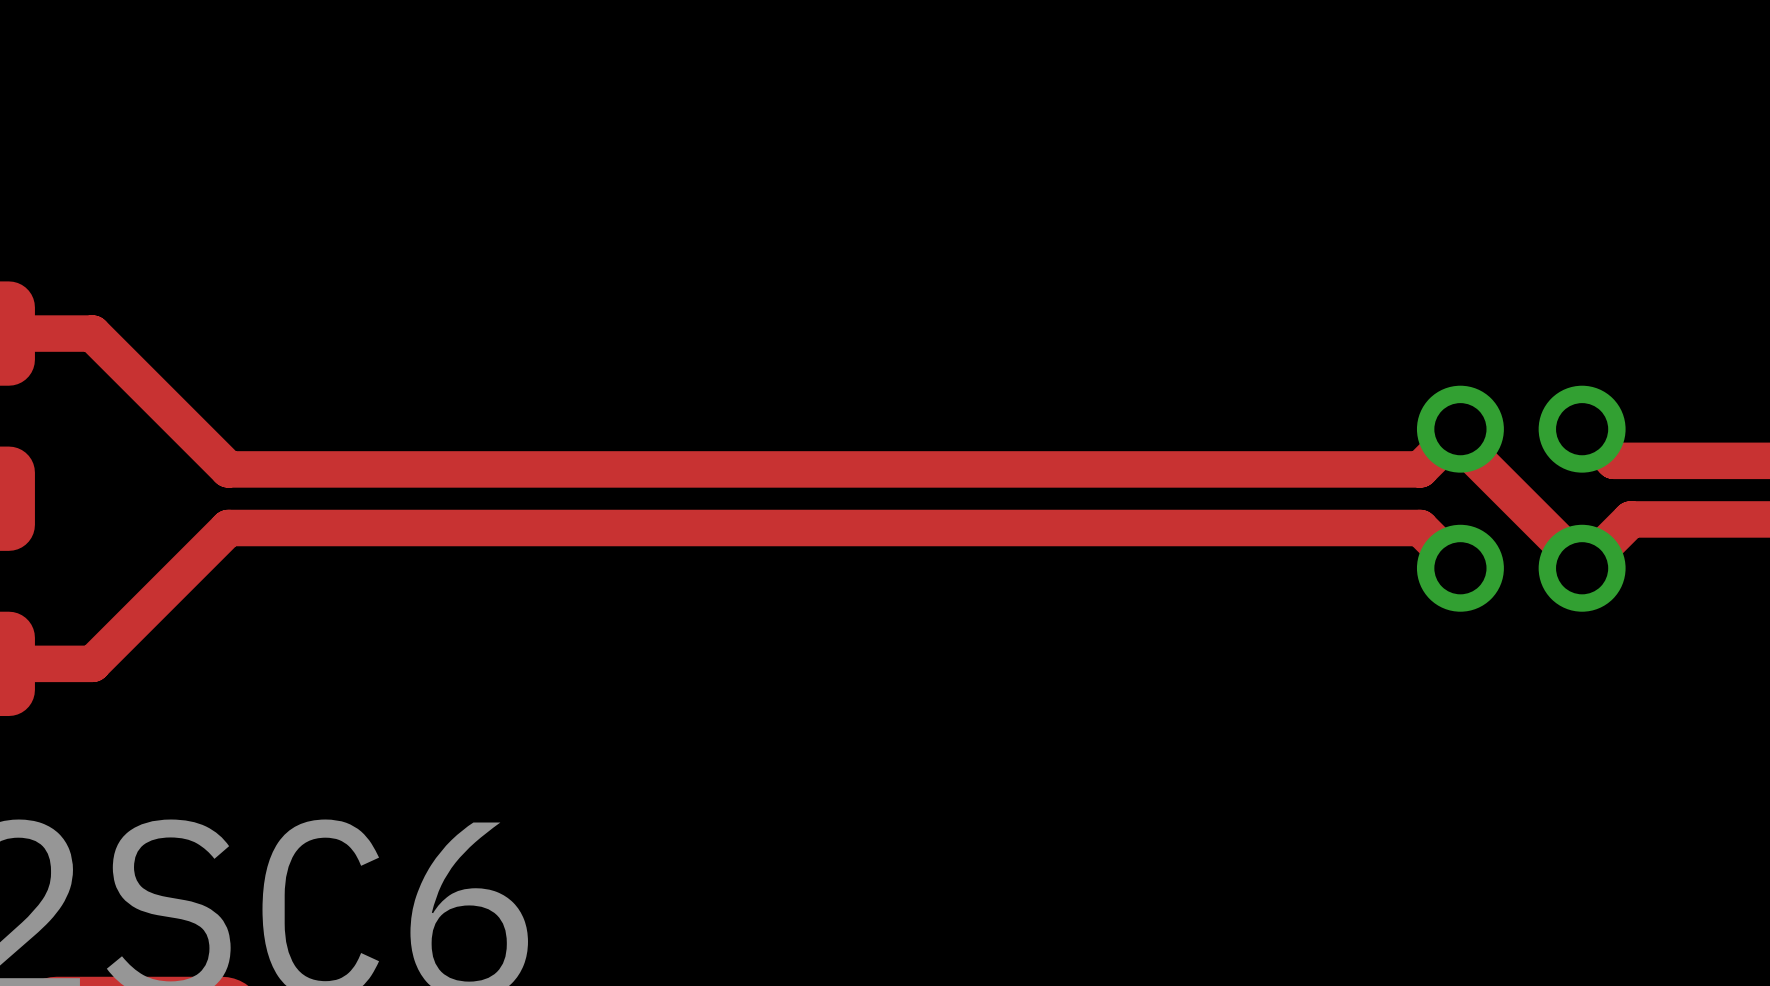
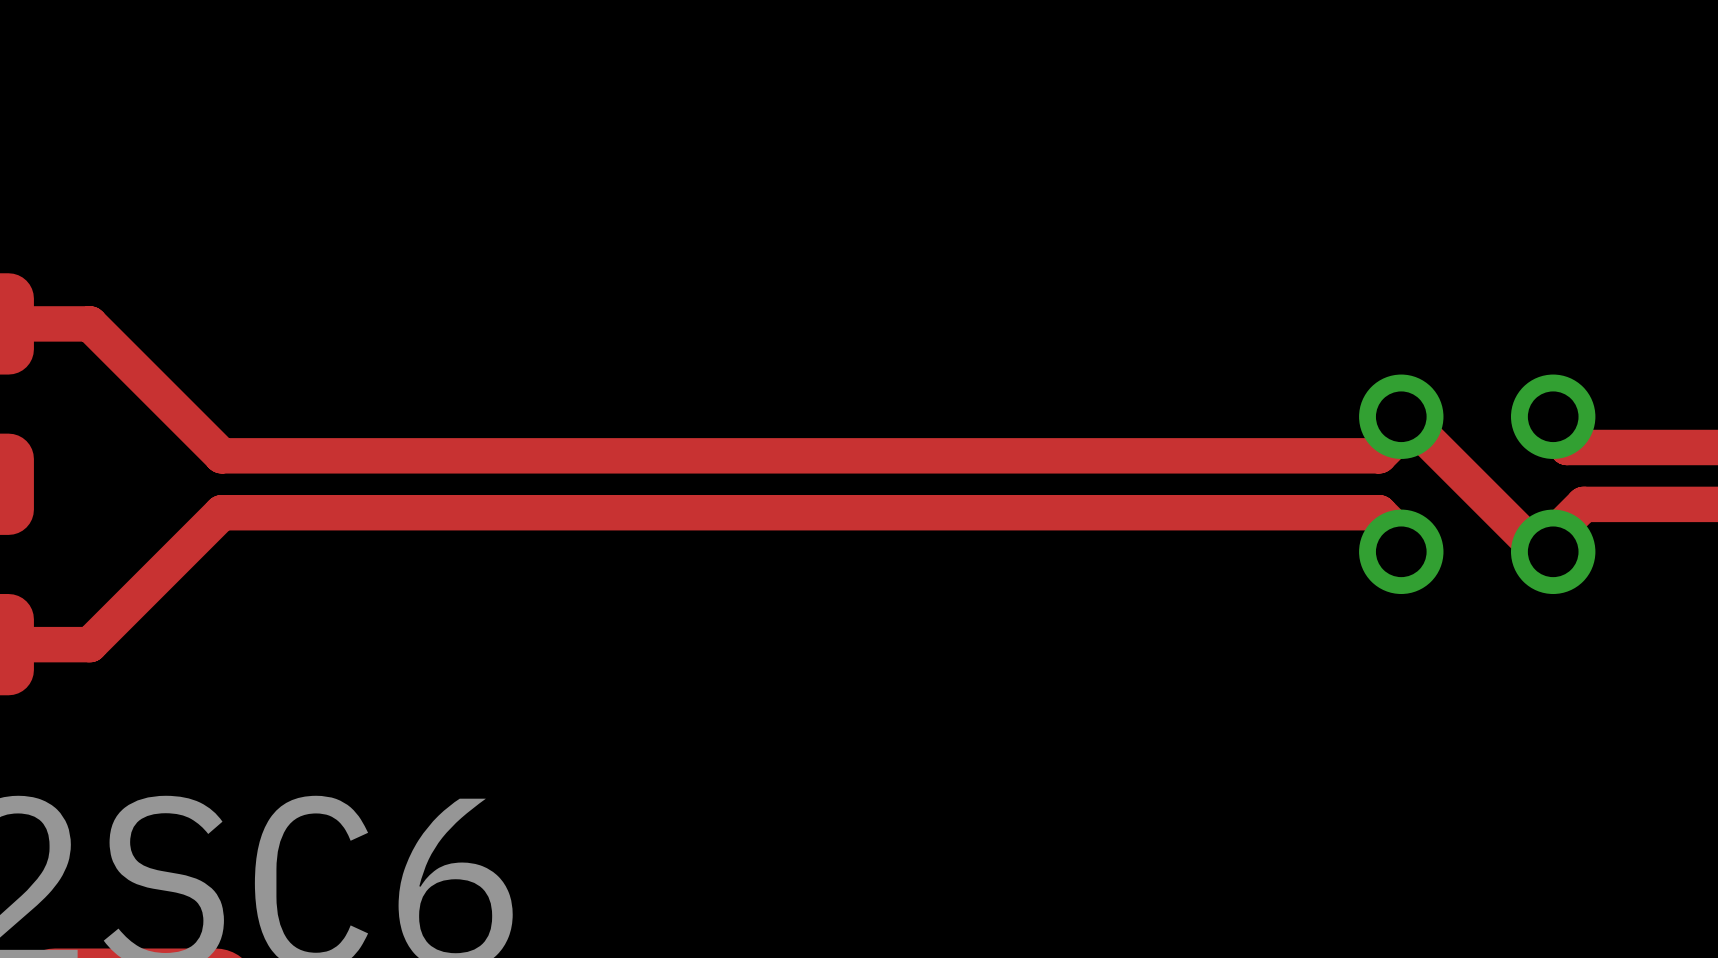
via position: (1460, 429) -> (1401, 416)
via position: (1582, 429) -> (1553, 416)
via position: (1460, 568) -> (1401, 551)
via position: (1582, 568) -> (1553, 551)

